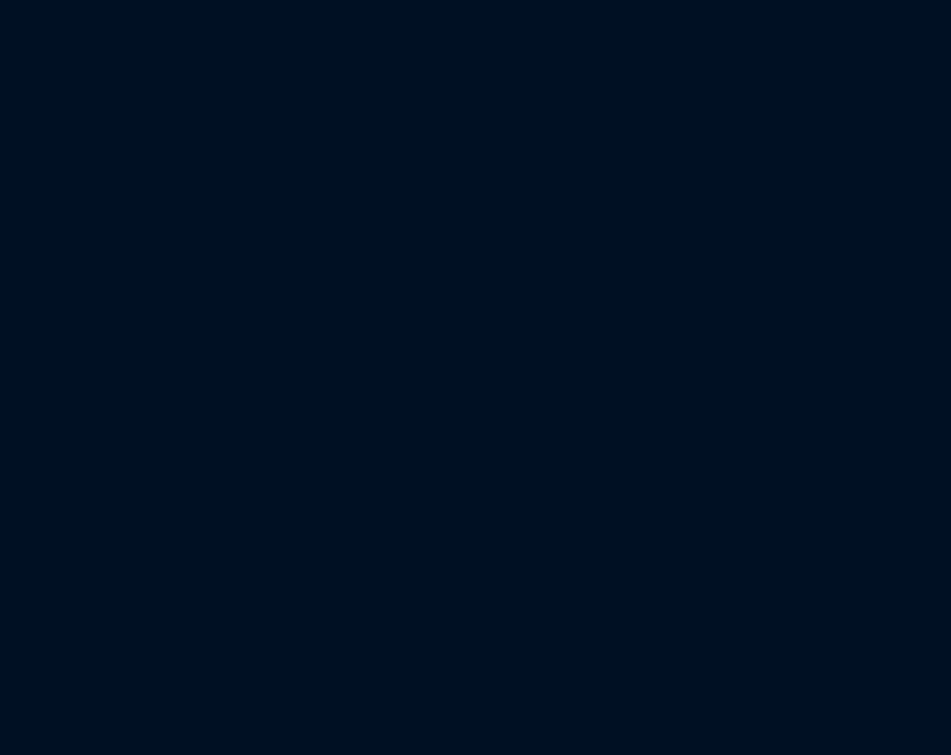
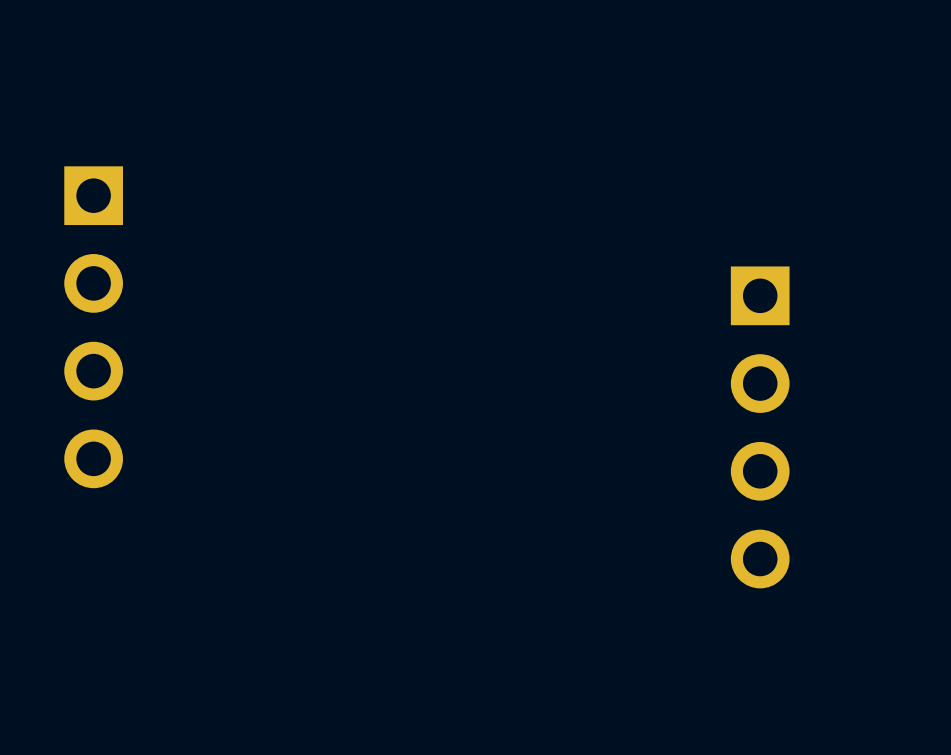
part: none -> (93, 327)
part: none -> (760, 427)

